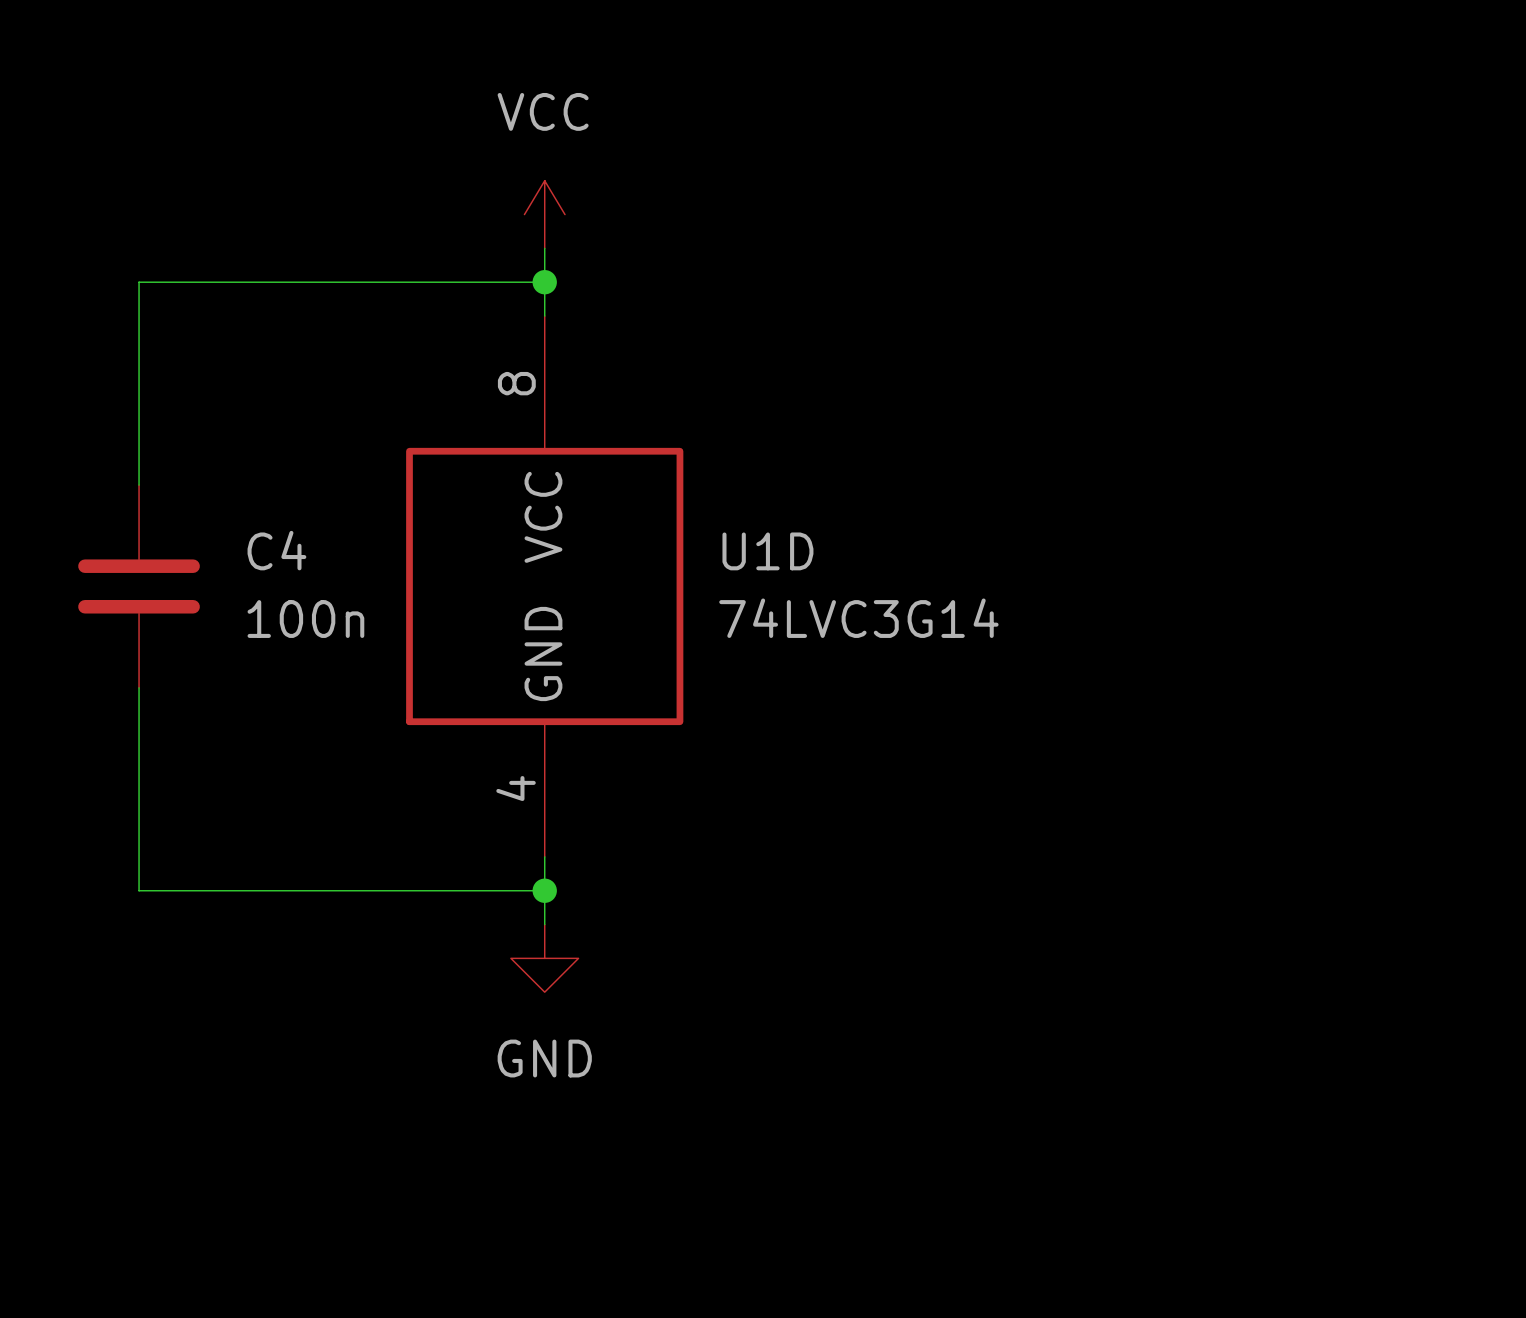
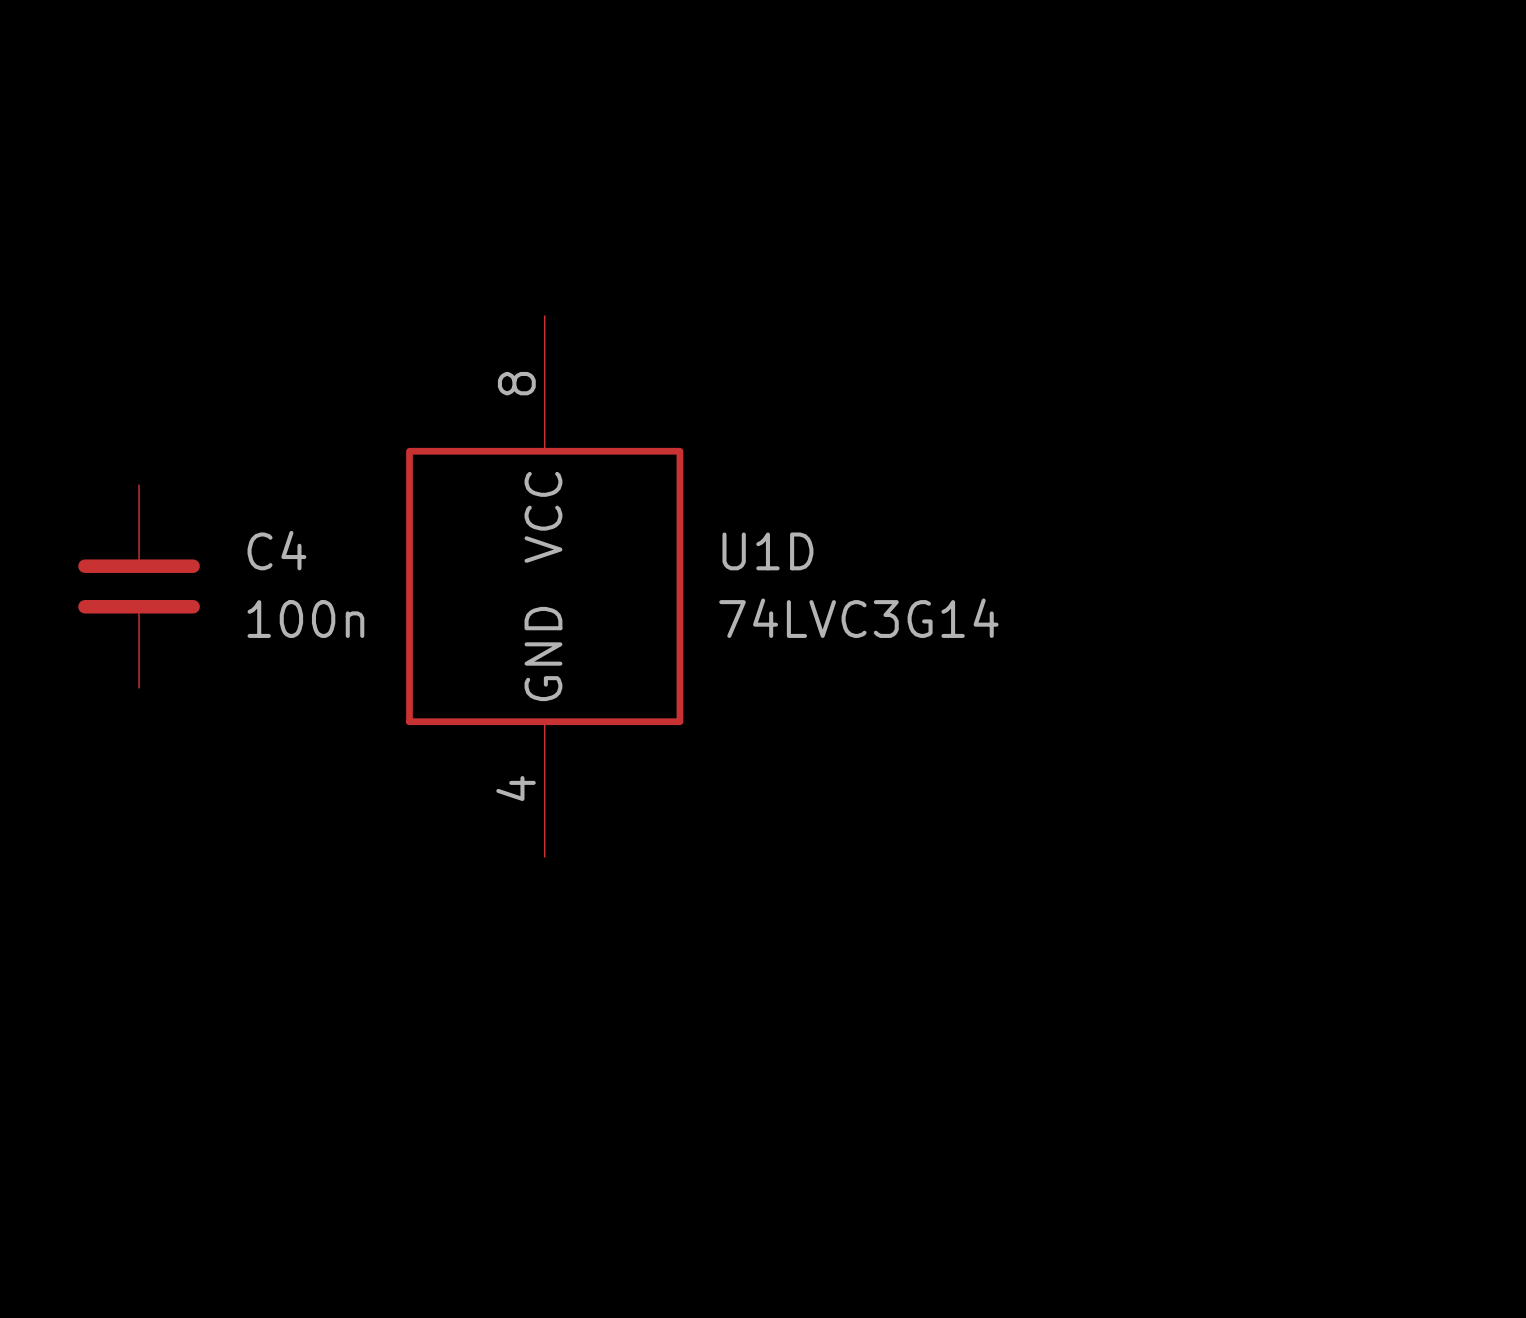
power symbol: VCC (544, 214) -> none
wire: (544, 248) (544, 316) -> none
wire: (544, 282) (139, 282) (139, 485) -> none
junction: (544, 282) -> none
wire: (139, 687) (139, 890) (544, 890) -> none
wire: (544, 856) (544, 924) -> none
junction: (544, 890) -> none
power symbol: GND (544, 958) -> none

